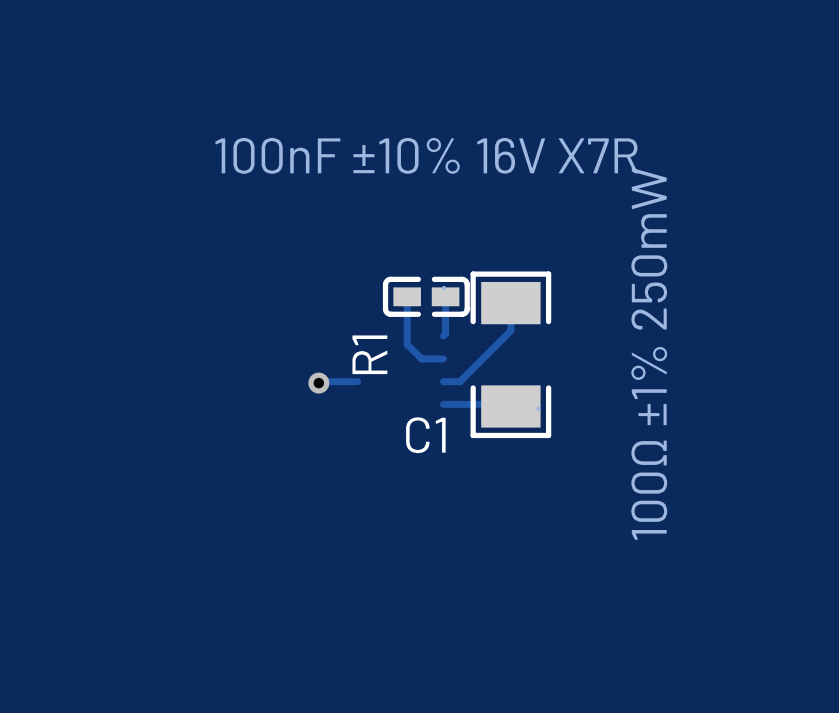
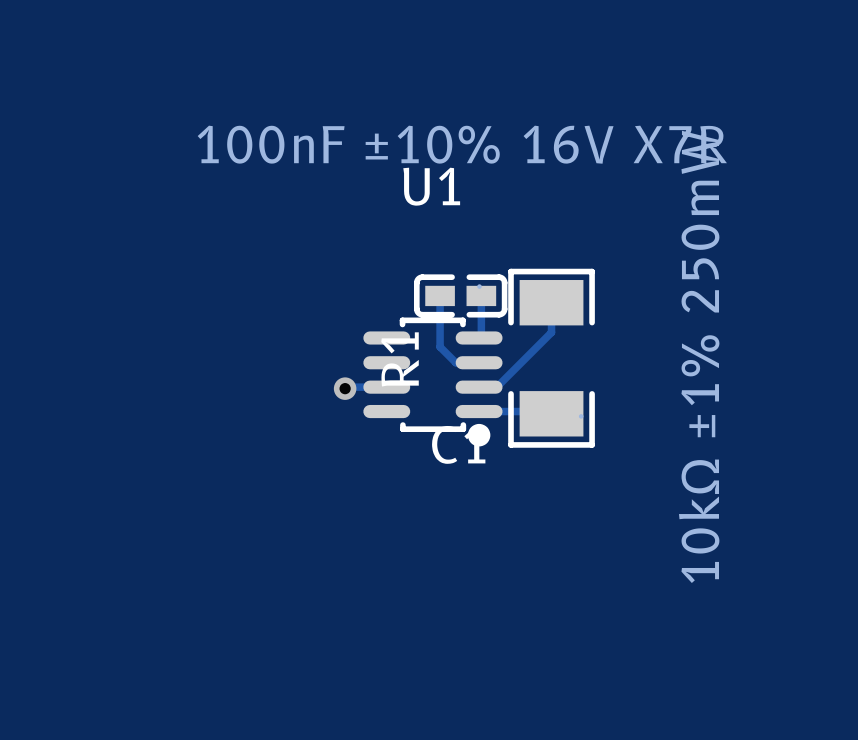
R1 value: 100Ω ±1% 250mW (649, 354) -> 10kΩ ±1% 250mW (699, 356)
U1: none -> (432, 381)

